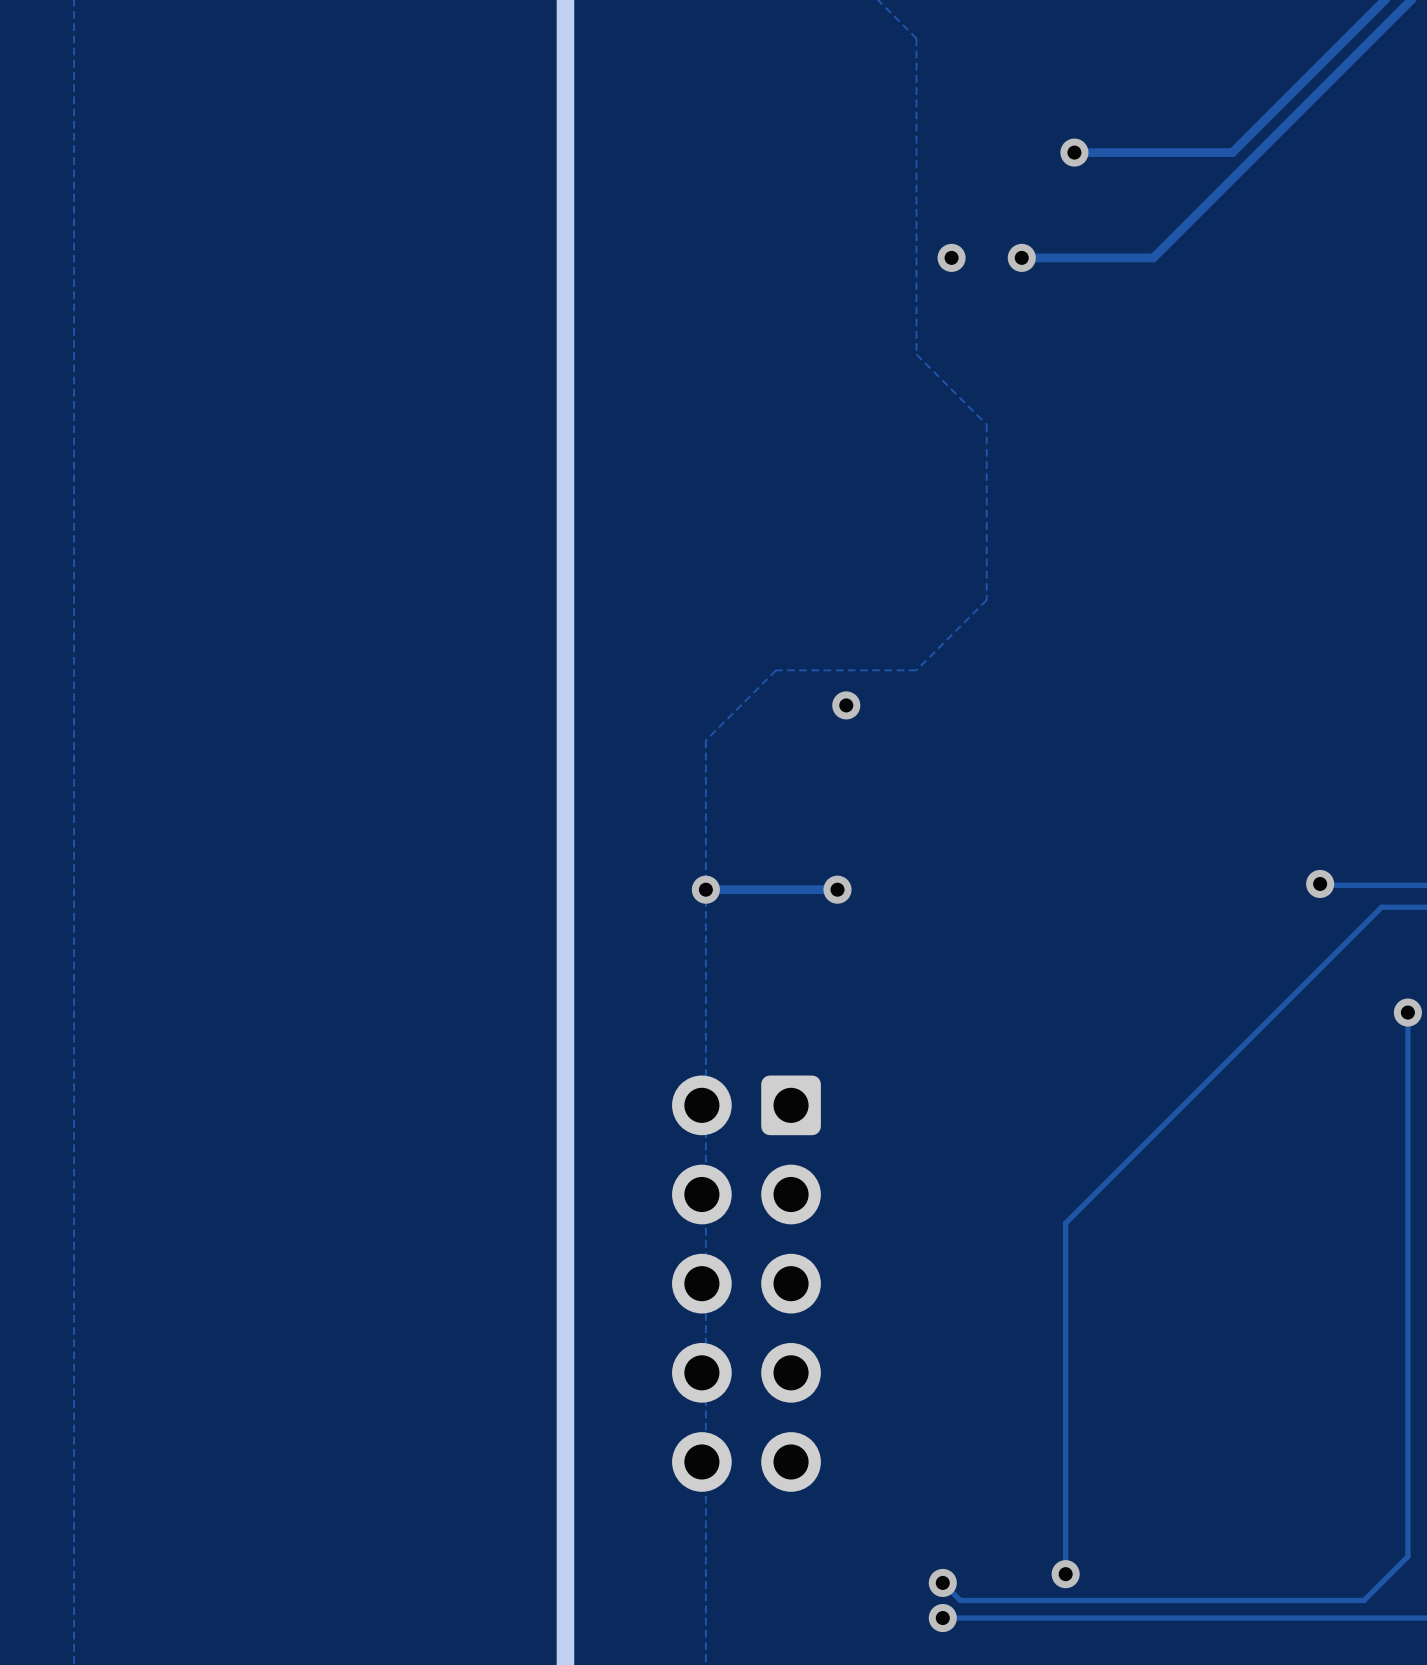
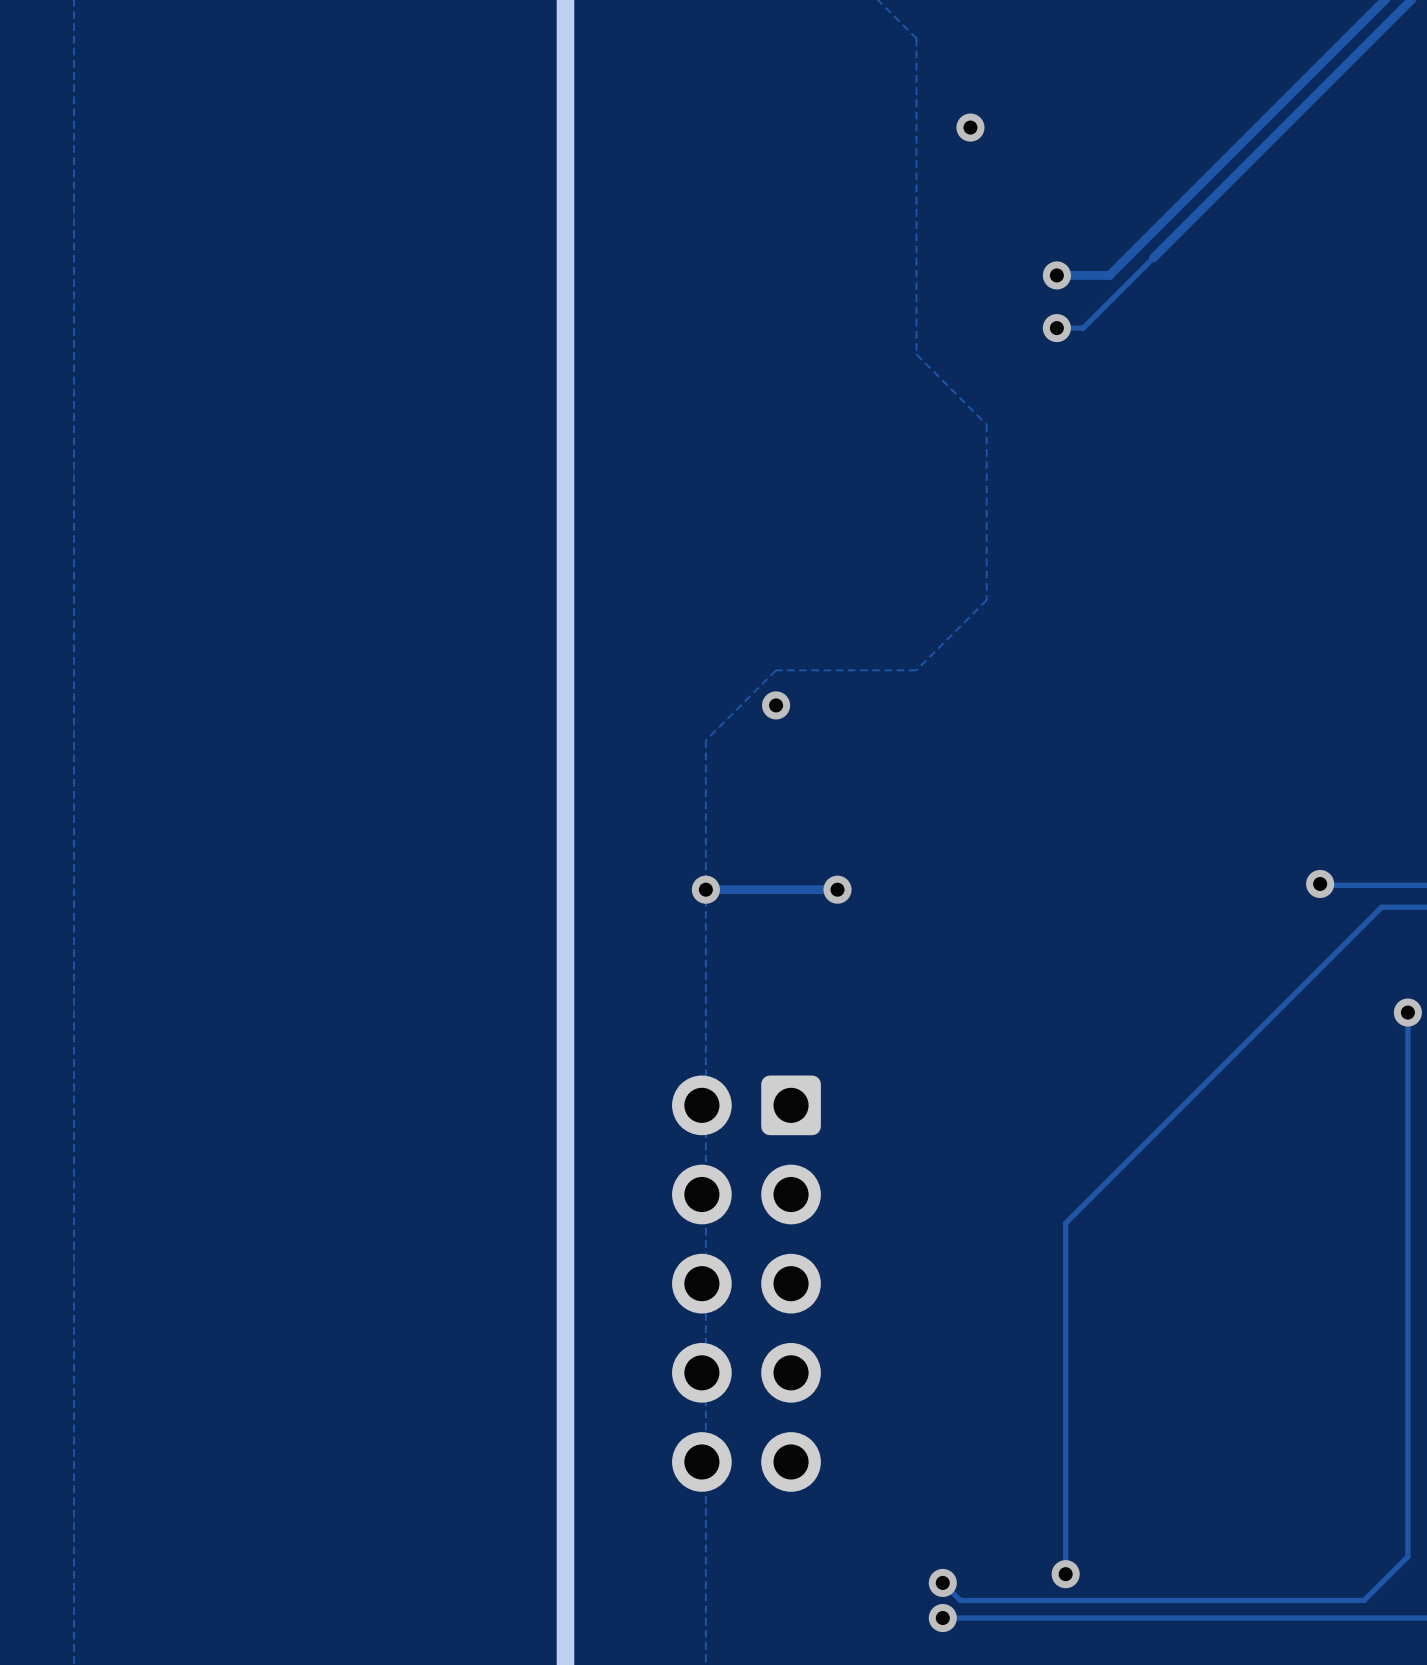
via: none -> (970, 127)
via: (1074, 152) -> none
track: (1232, 152) (1074, 152) -> (1232, 152) (1109, 275) (1056, 275)
via: (951, 257) -> none
via: (1021, 257) -> none
track: (1153, 257) (1021, 257) -> (1153, 257) (1083, 328) (1056, 328)
via: none -> (1056, 275)
via: none -> (1056, 328)
via position: (846, 705) -> (776, 705)

